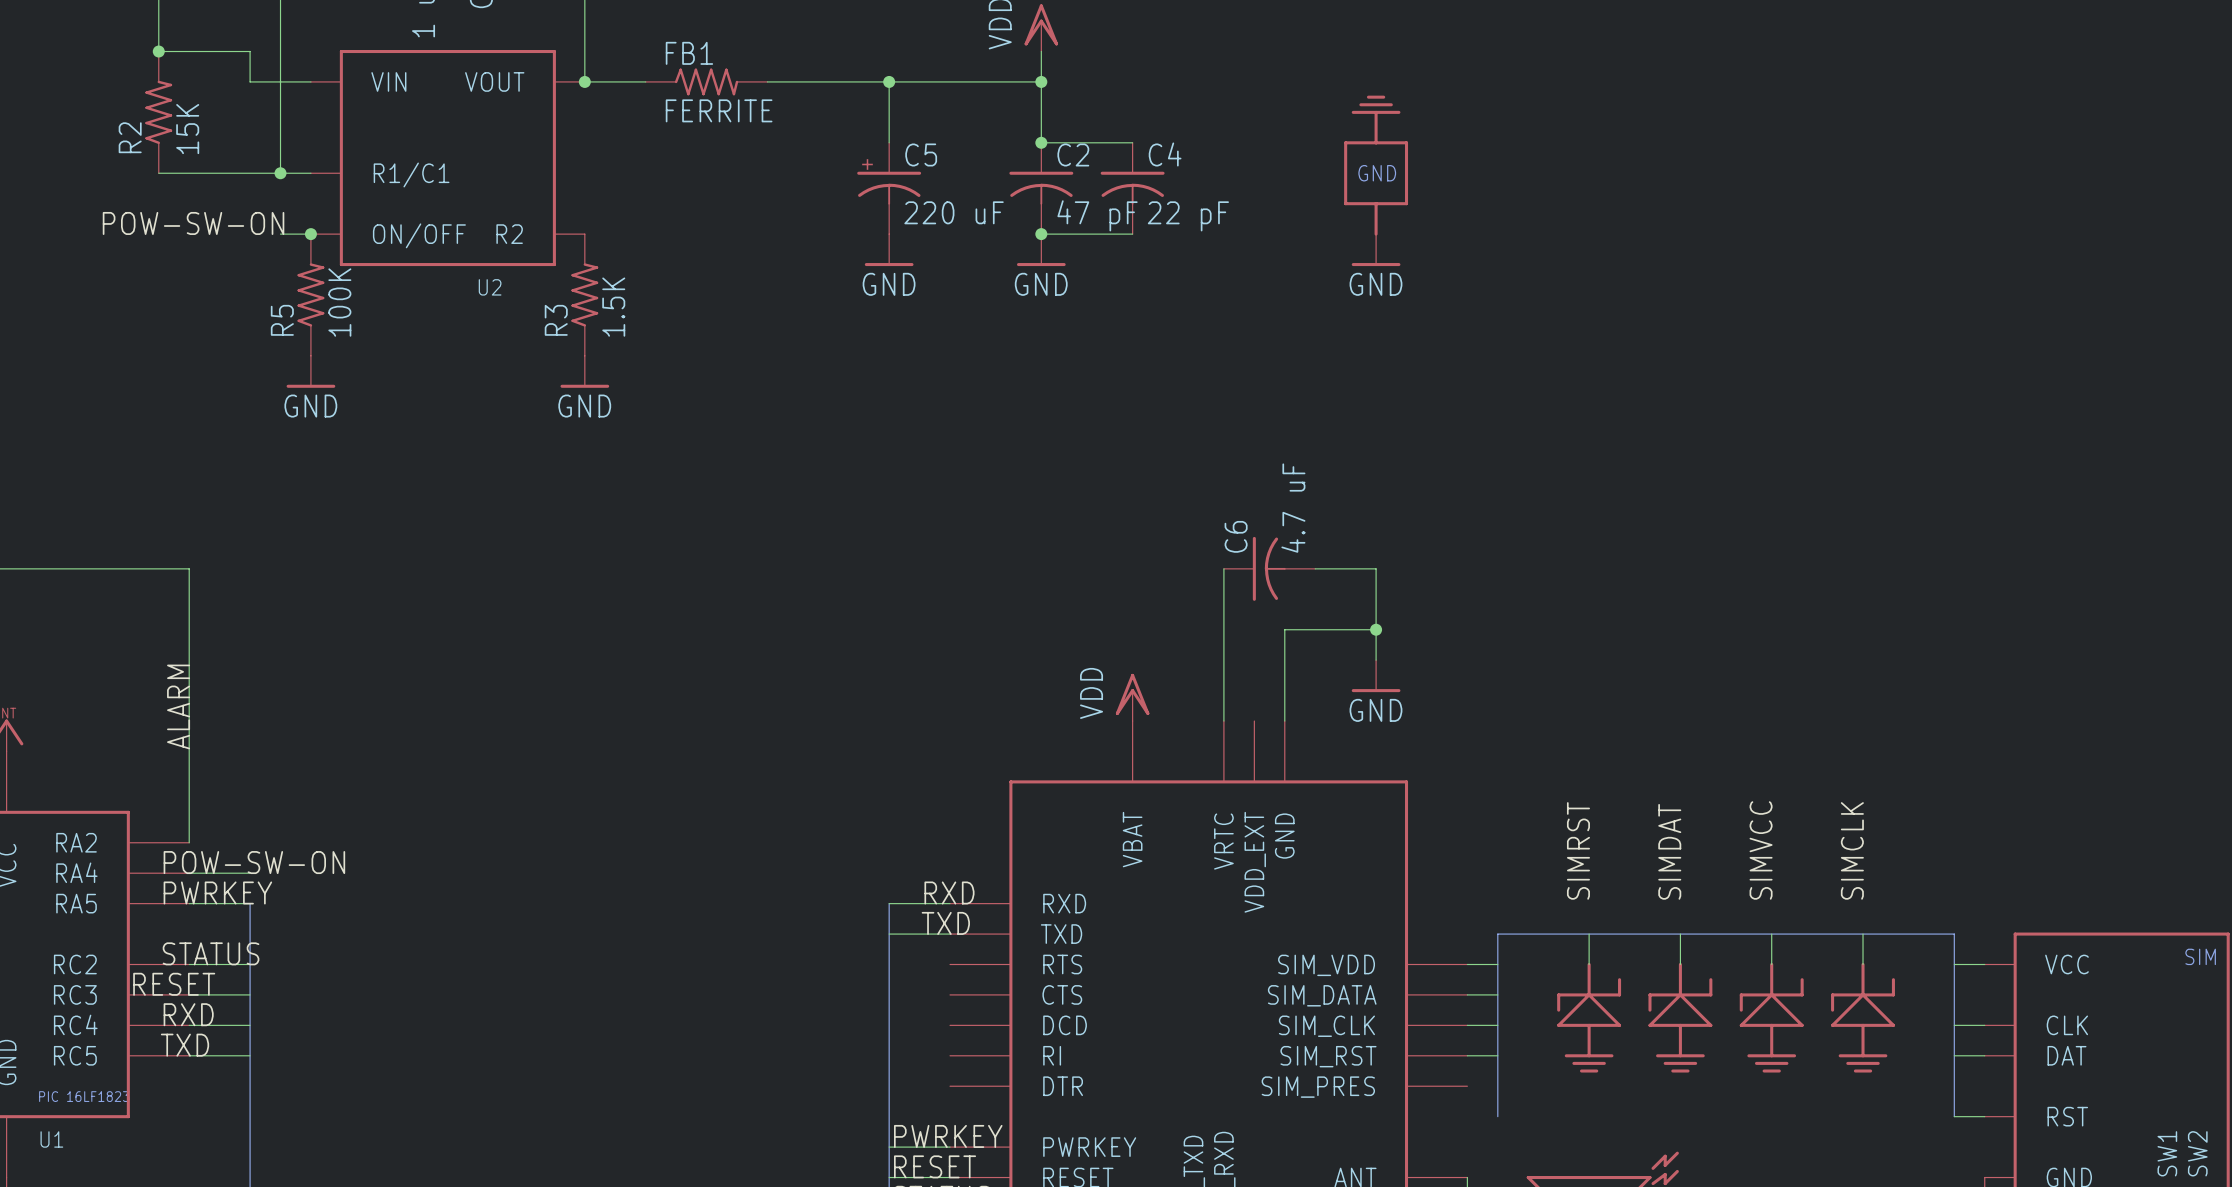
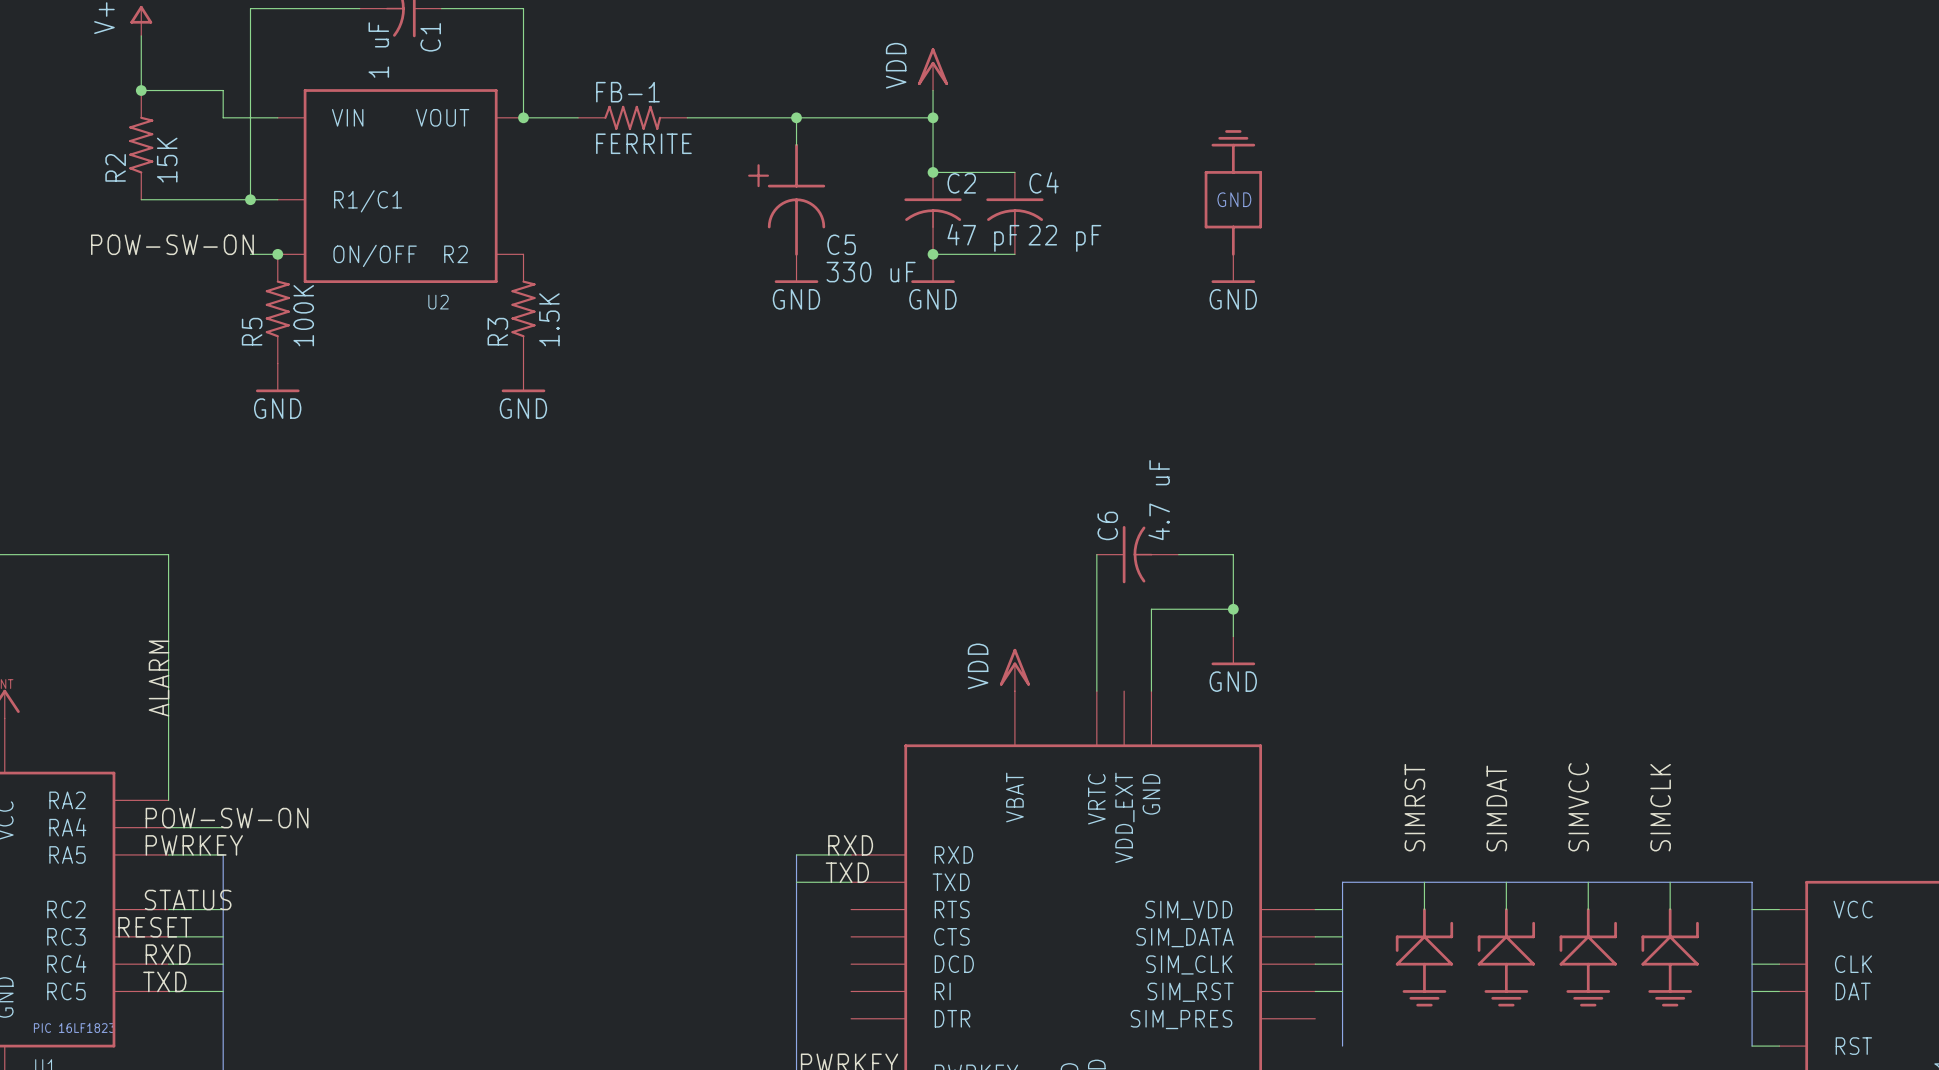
FB1 name: FB1 (689, 53) -> FB-1 (627, 92)
C5 symbol: [857, 142, 922, 235] -> [767, 143, 826, 256]
C5 name position: C5 (921, 154) -> C5 (841, 244)
C5 value: 220 uF (954, 212) -> 330 uF (871, 272)

